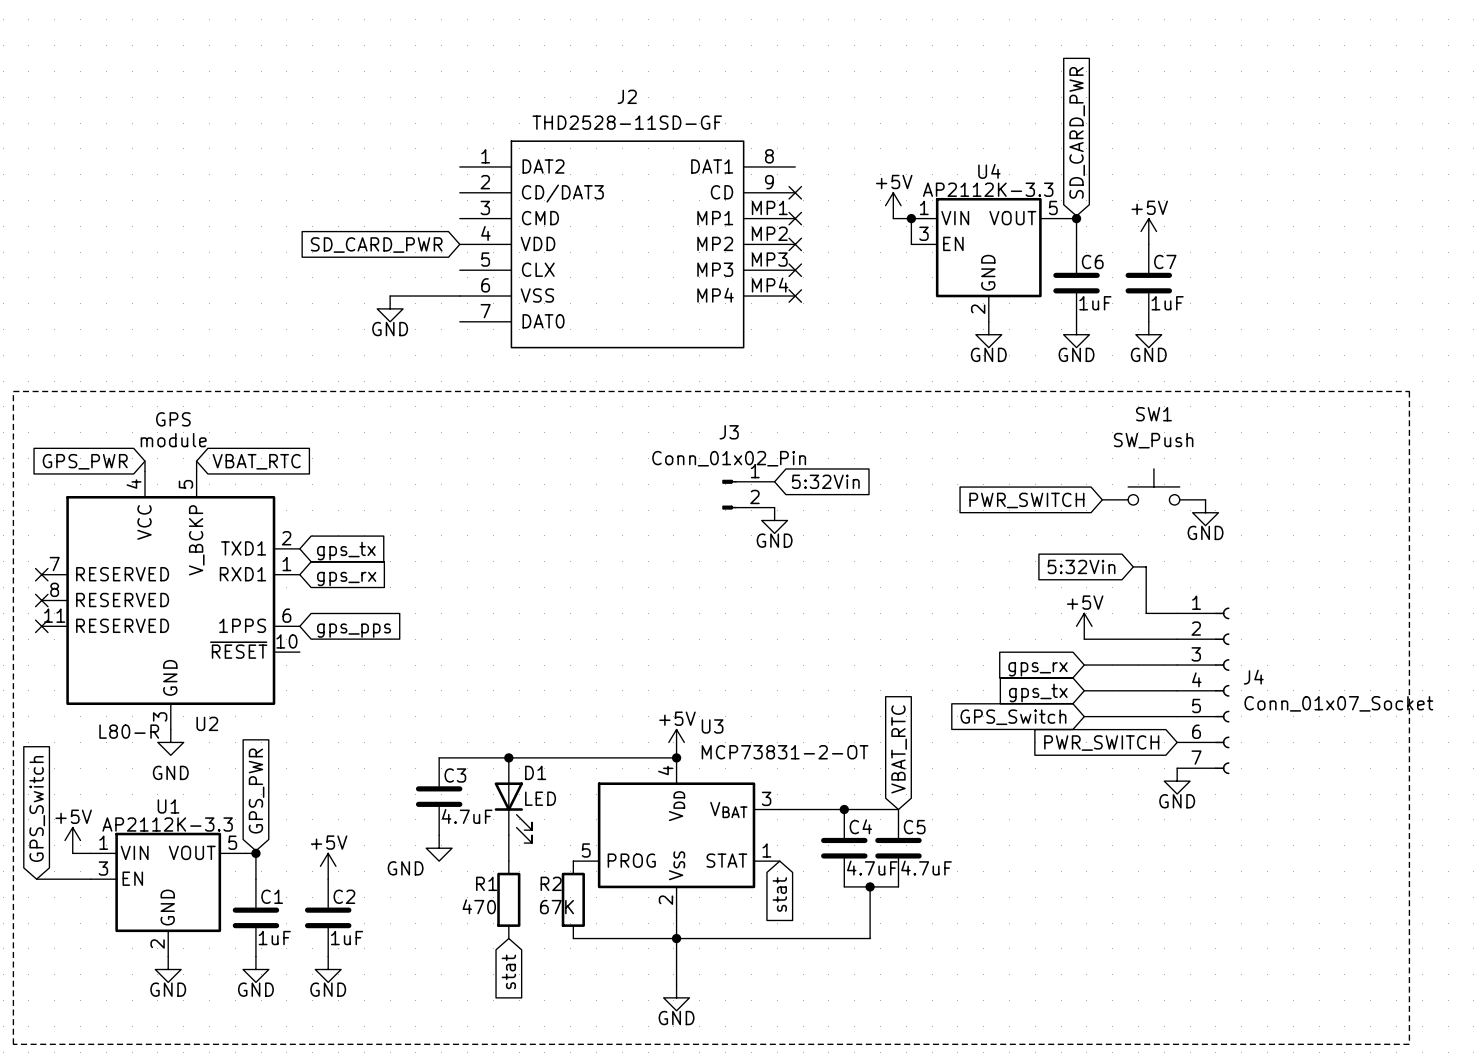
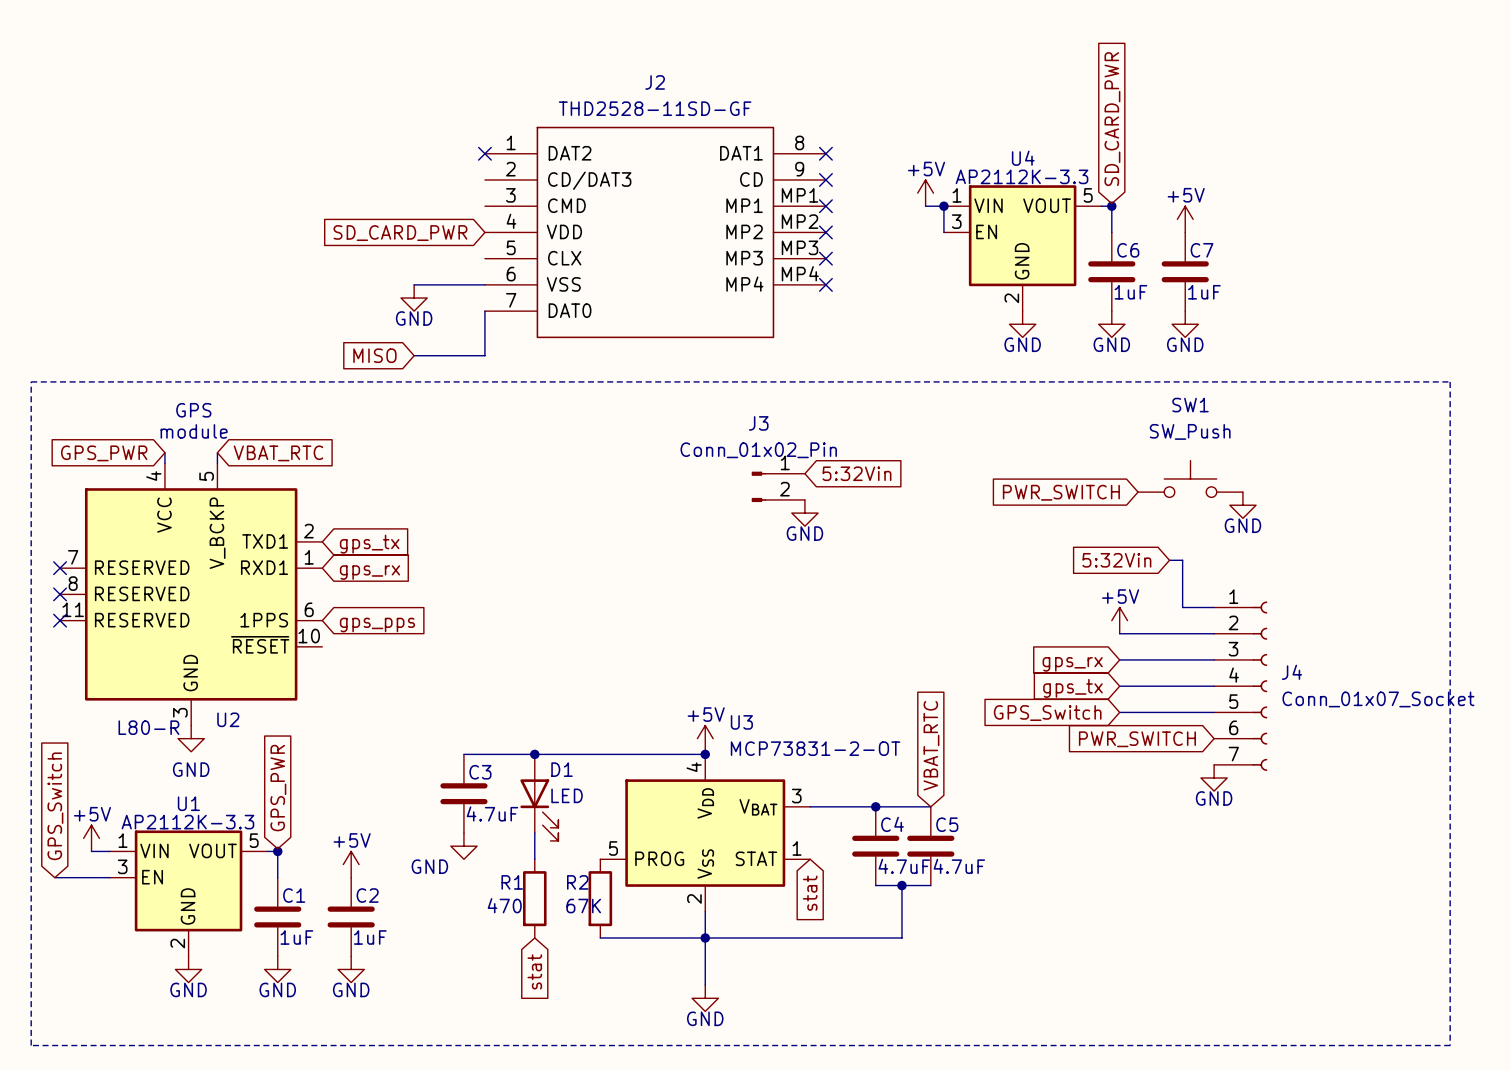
no-connect mark: none -> (484, 153)
no-connect mark: none -> (825, 153)
wire: none -> (484, 311) (484, 355) (414, 355)
global label: none -> MISO (374, 355)

